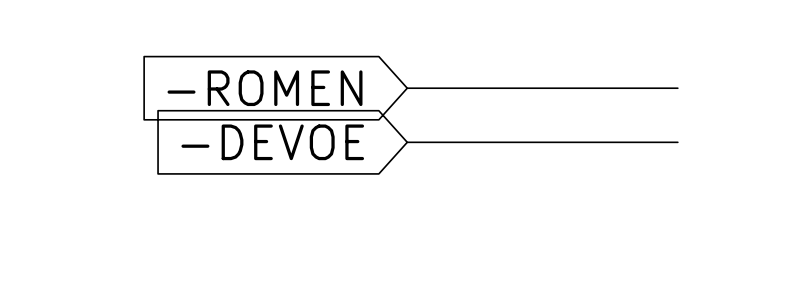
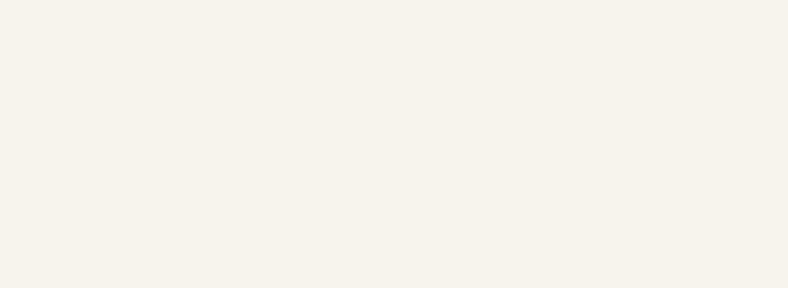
global label: -ROMEN (265, 88) -> none
wire: (407, 88) (677, 88) -> none
global label: -DEVOE (272, 142) -> none
wire: (407, 142) (677, 142) -> none

